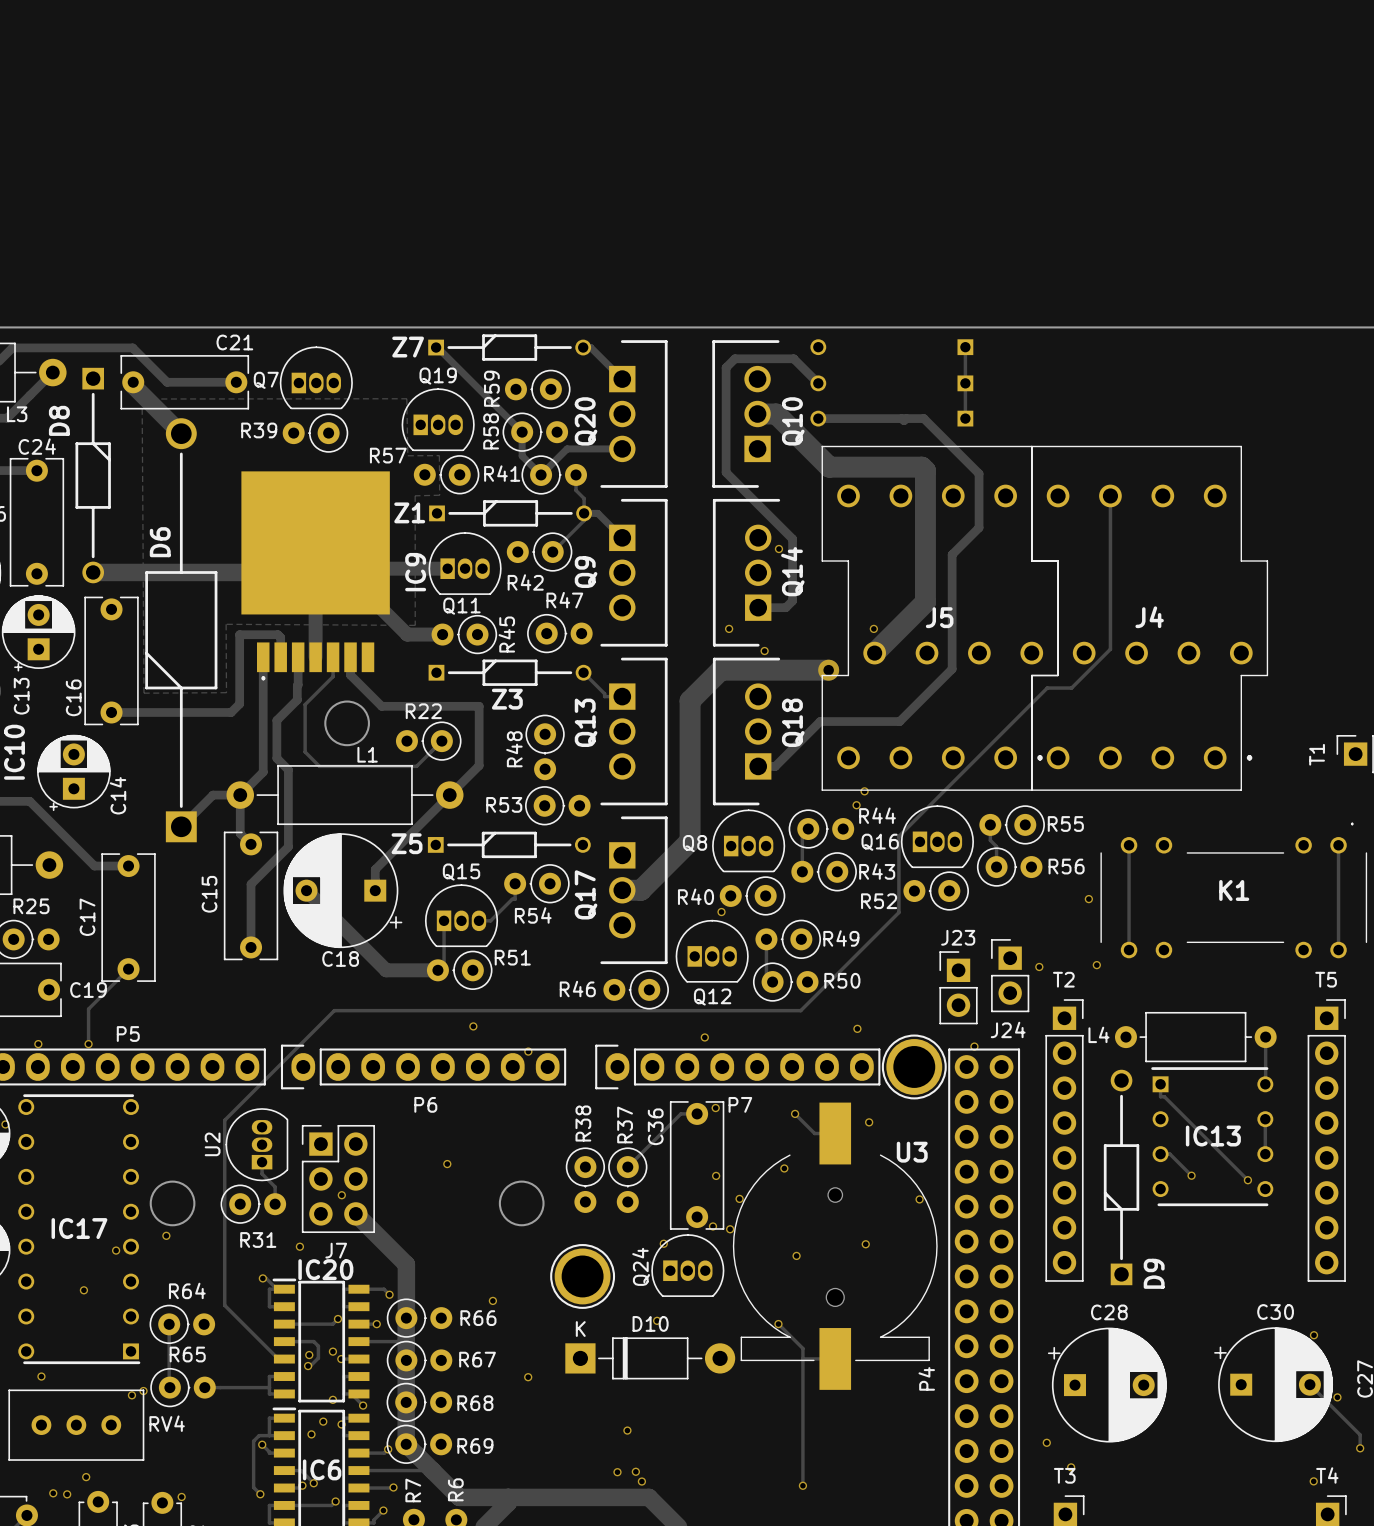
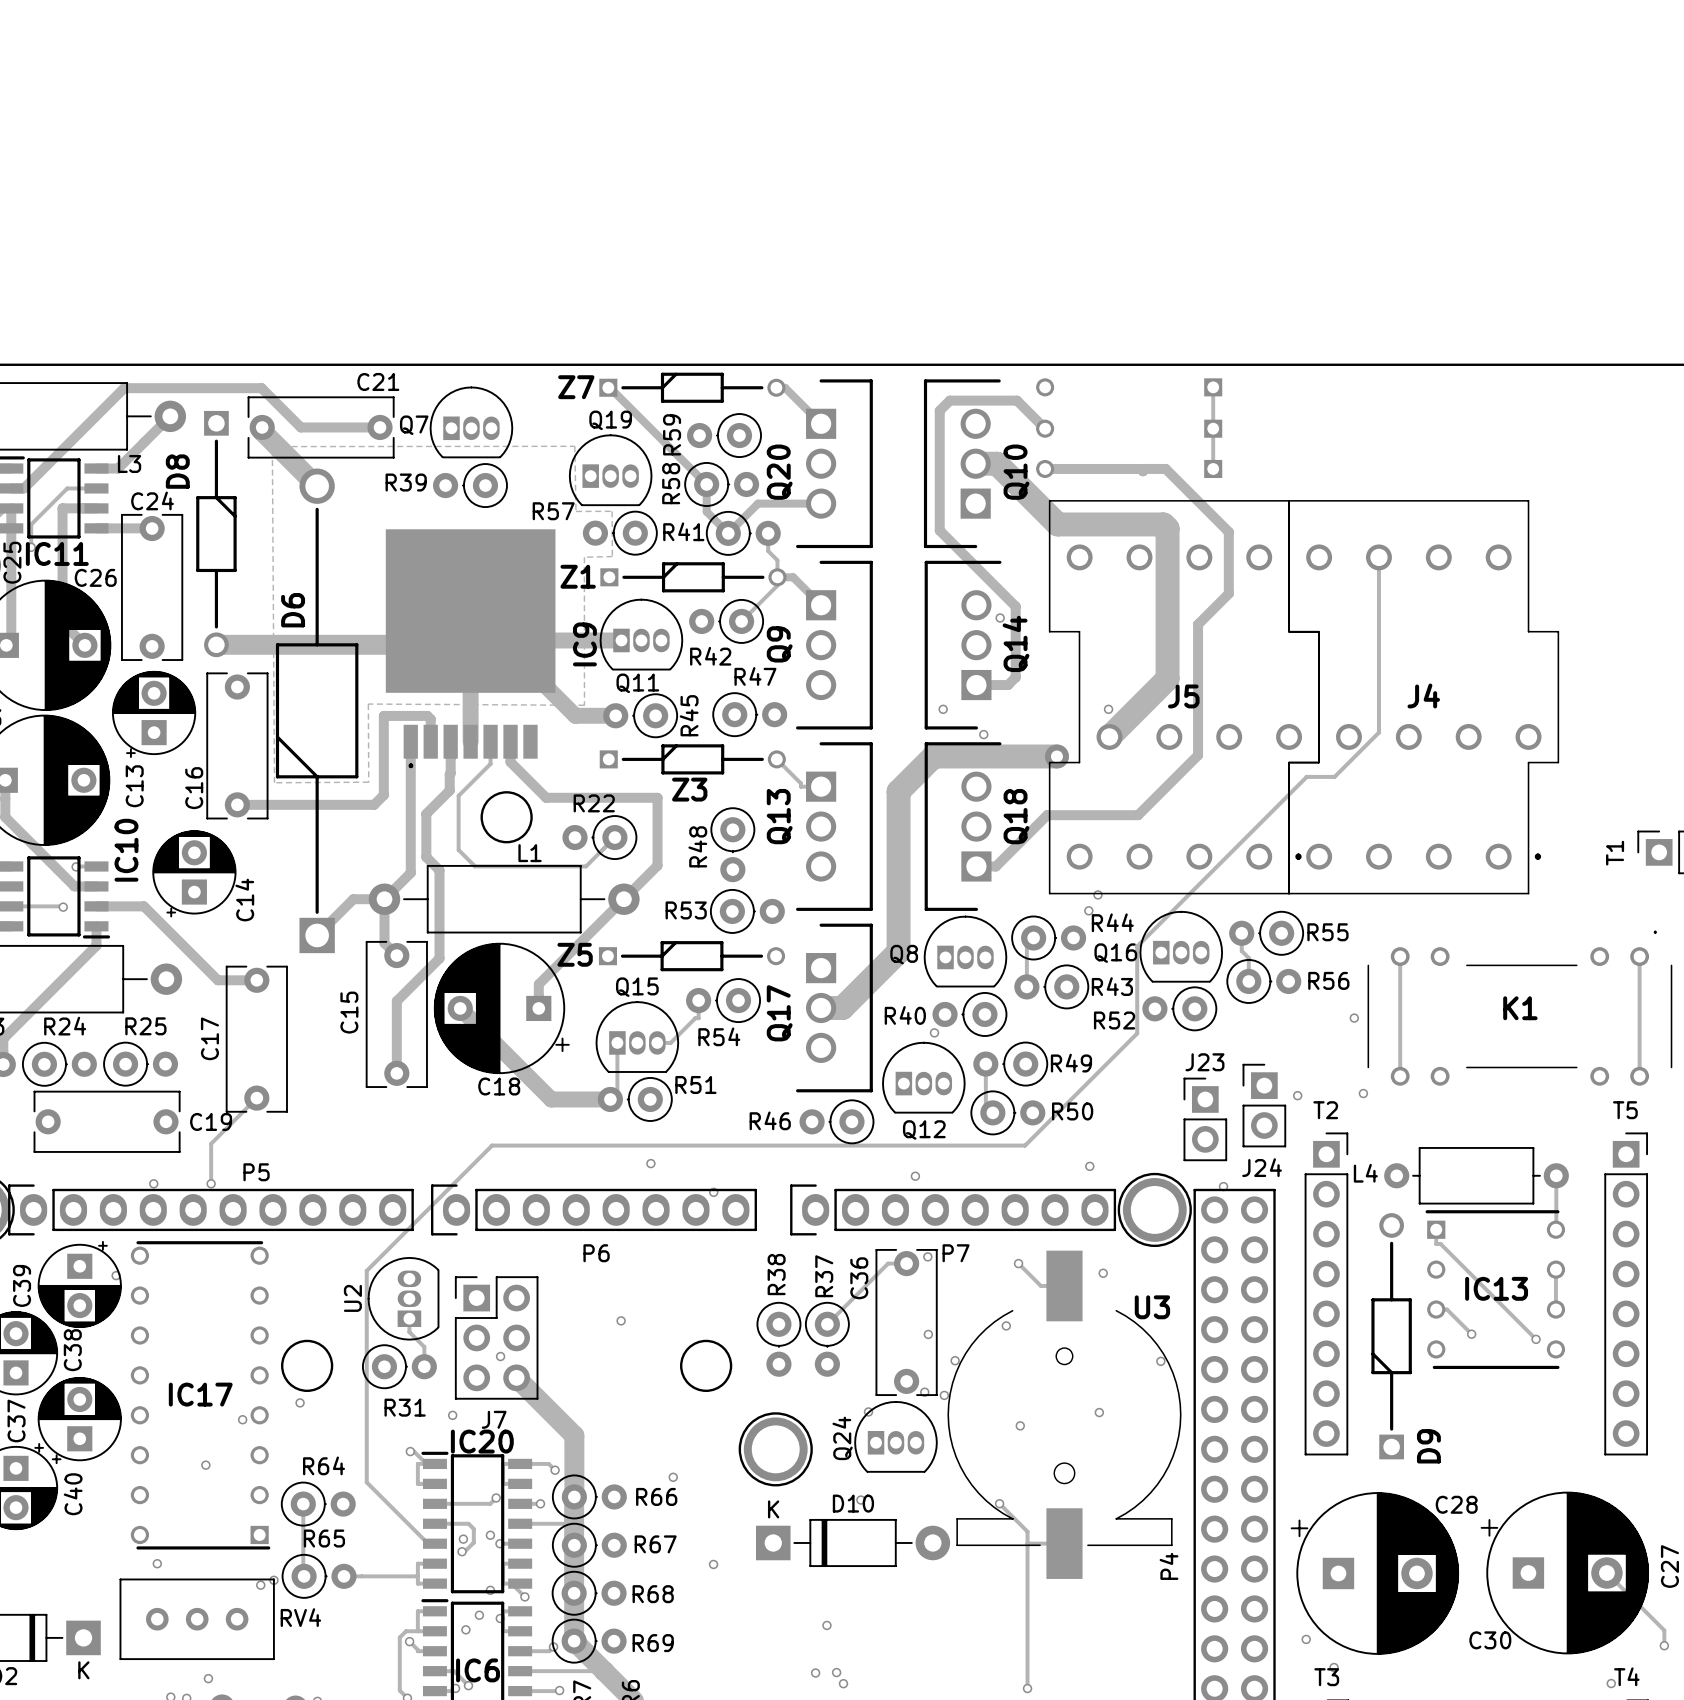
C28 name position: C28 (1109, 1312) -> C28 (1456, 1504)
C30 name position: C30 (1275, 1312) -> C30 (1490, 1640)
C28 footprint: [1047, 1327, 1167, 1443] -> [1290, 1492, 1460, 1655]
C30 footprint: [1214, 1327, 1334, 1443] -> [1480, 1491, 1650, 1655]

